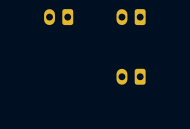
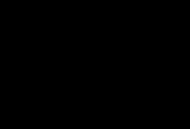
part: (58, 17) -> none
part: (131, 17) -> none
part: (131, 76) -> none

